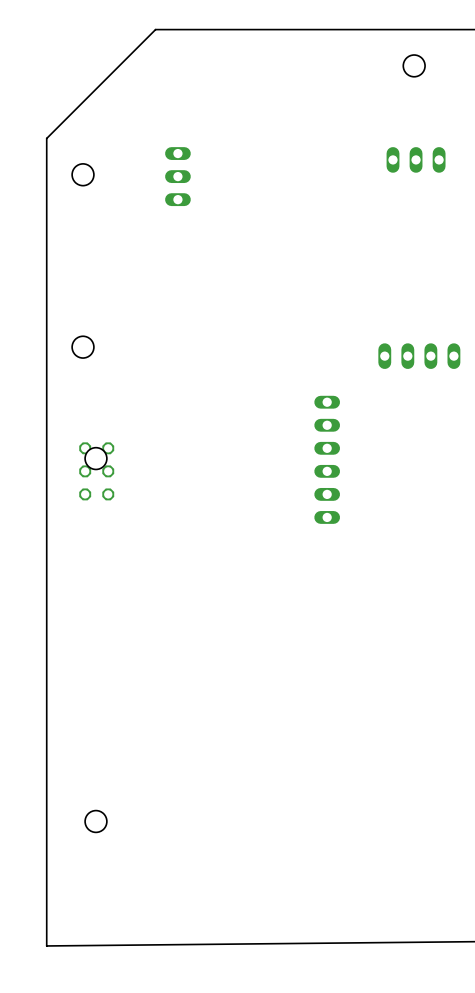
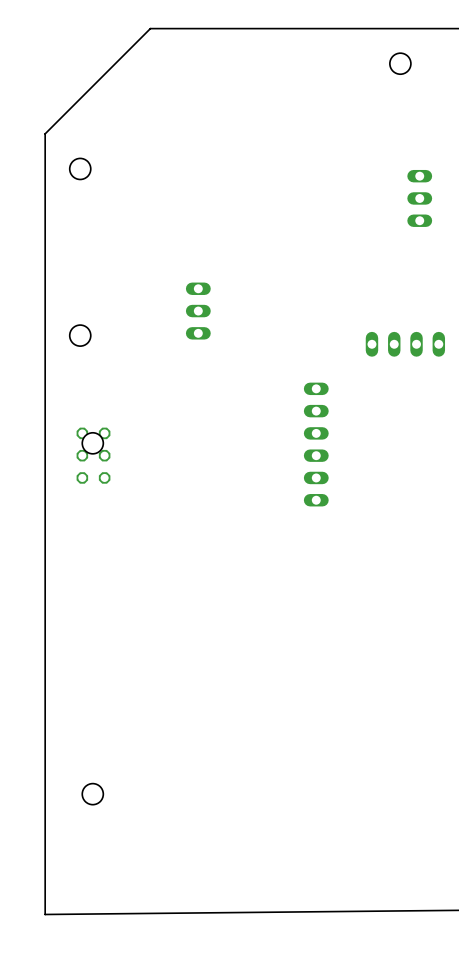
part rotation: 0° (416, 159) -> 90° clockwise (419, 198)
part position: (416, 159) -> (419, 198)
part: (177, 176) -> none
part: none -> (198, 311)

